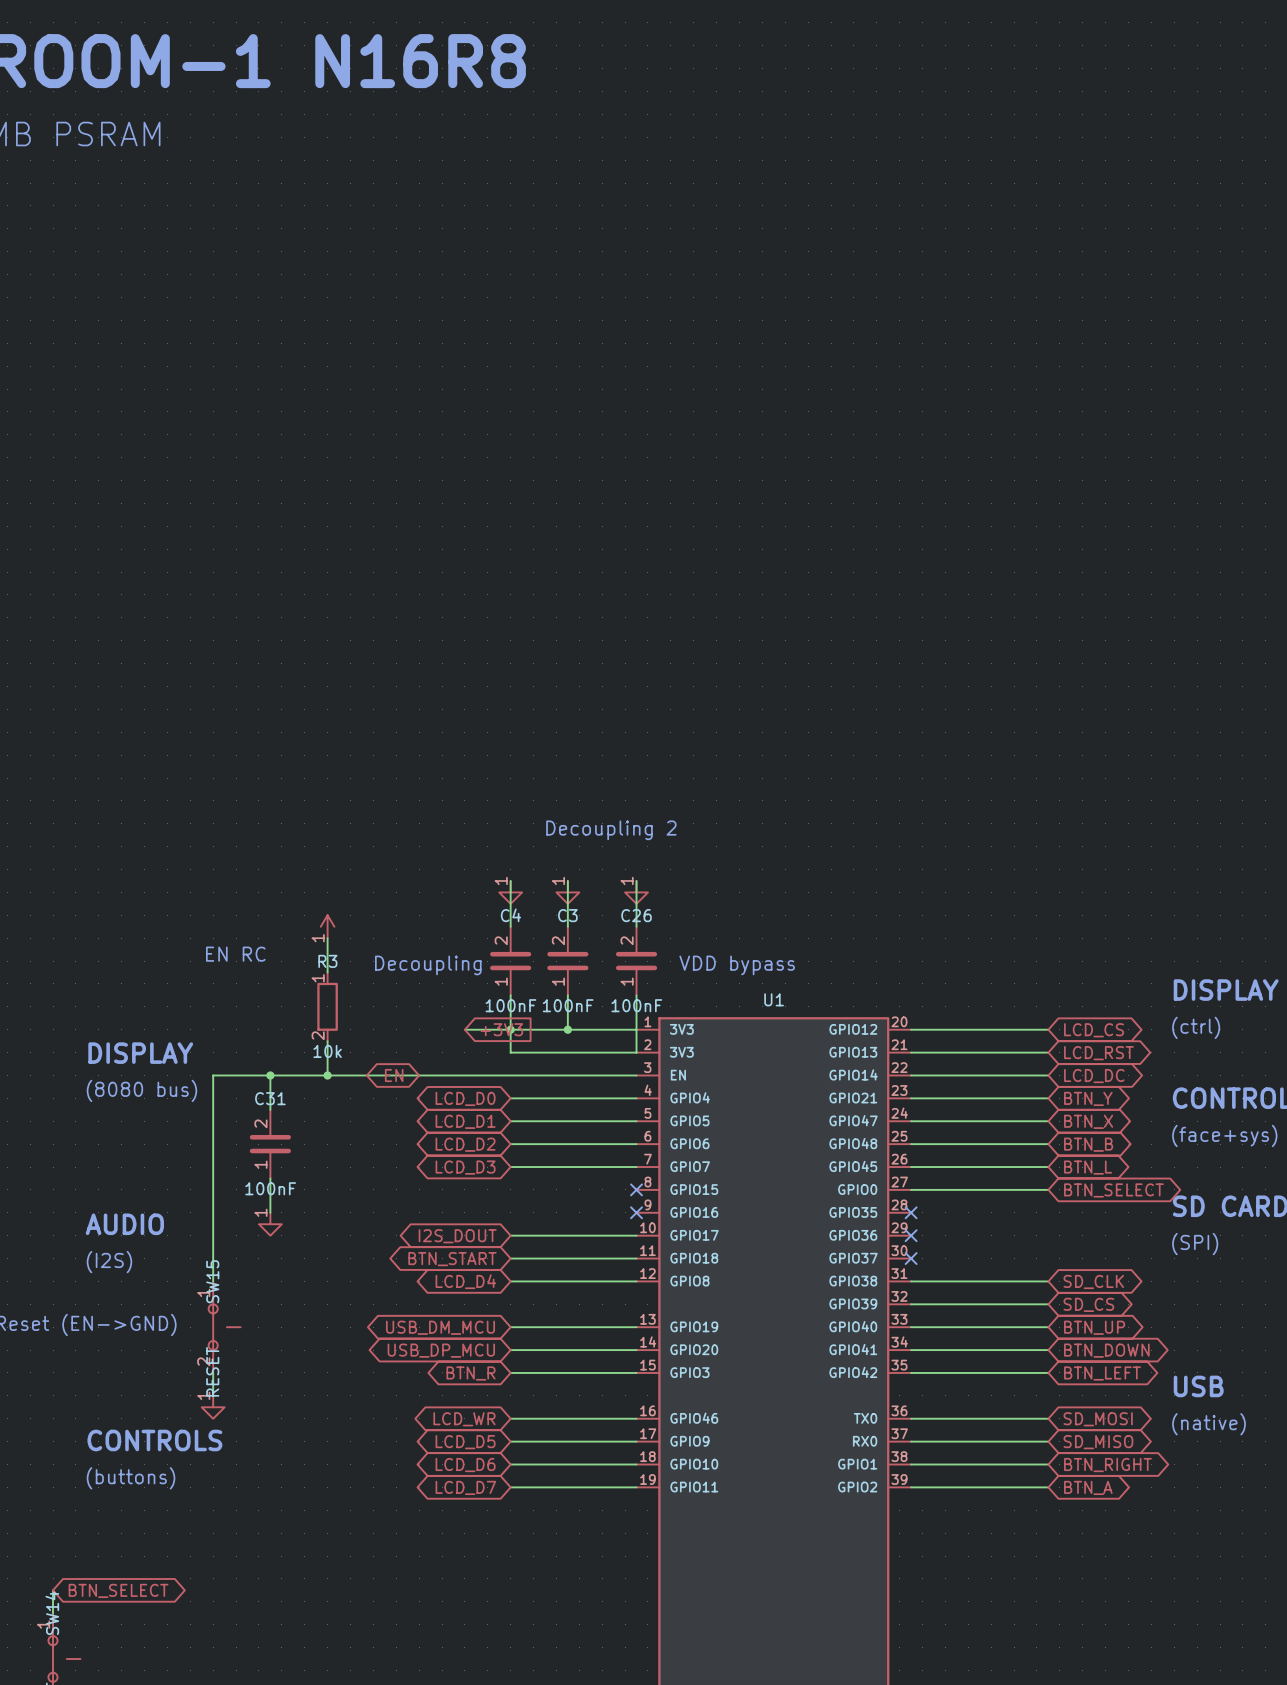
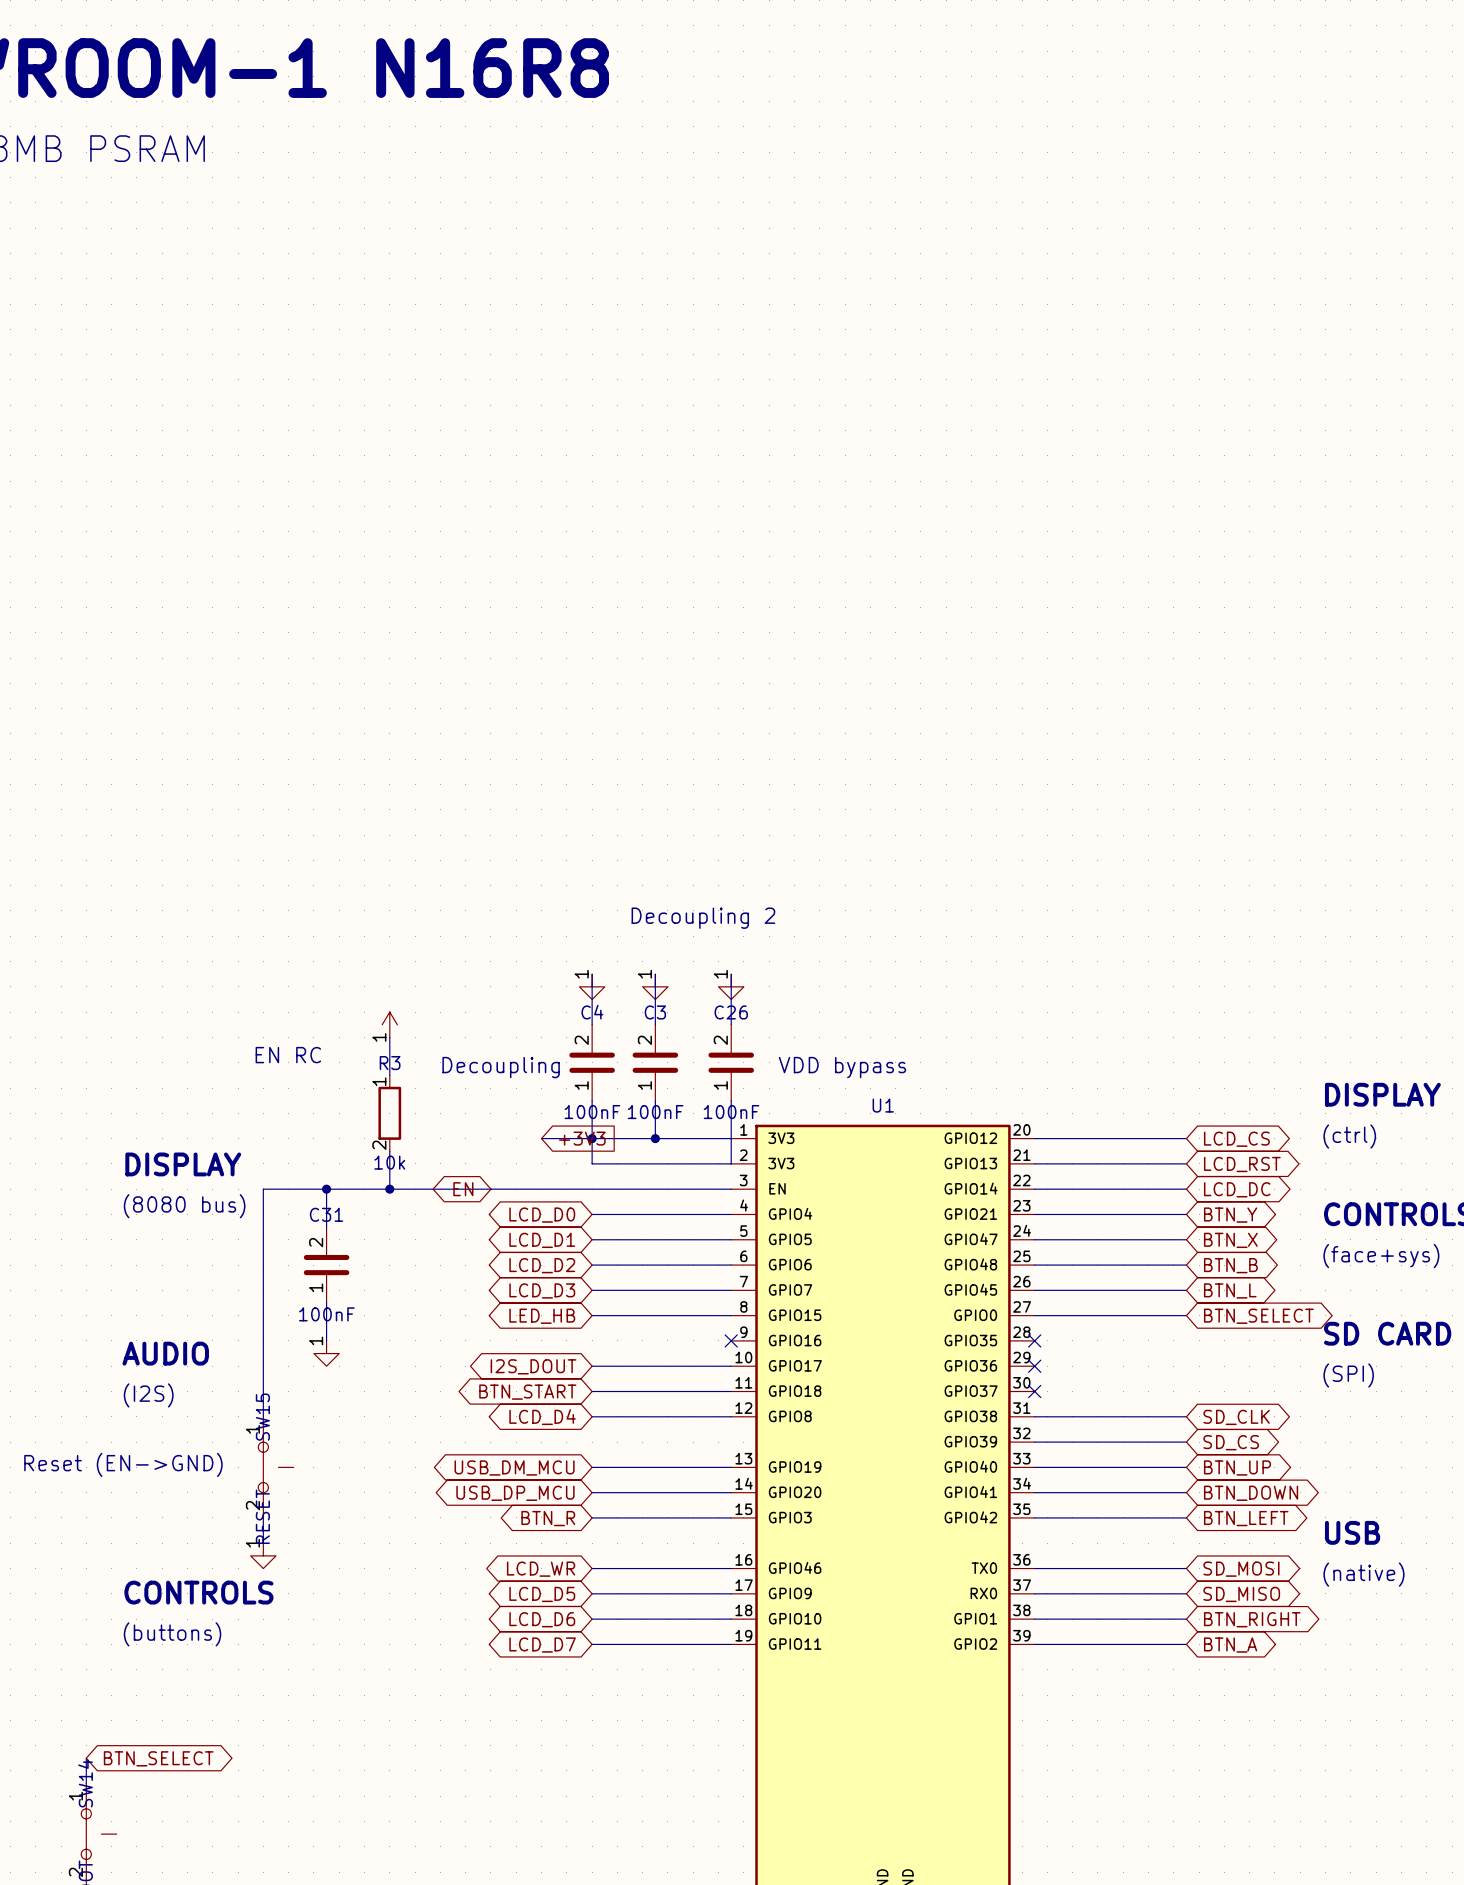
wire: none -> (592, 1315) (731, 1315)
no-connect mark: (636, 1189) -> none
global label: none -> LED_HB (542, 1316)

